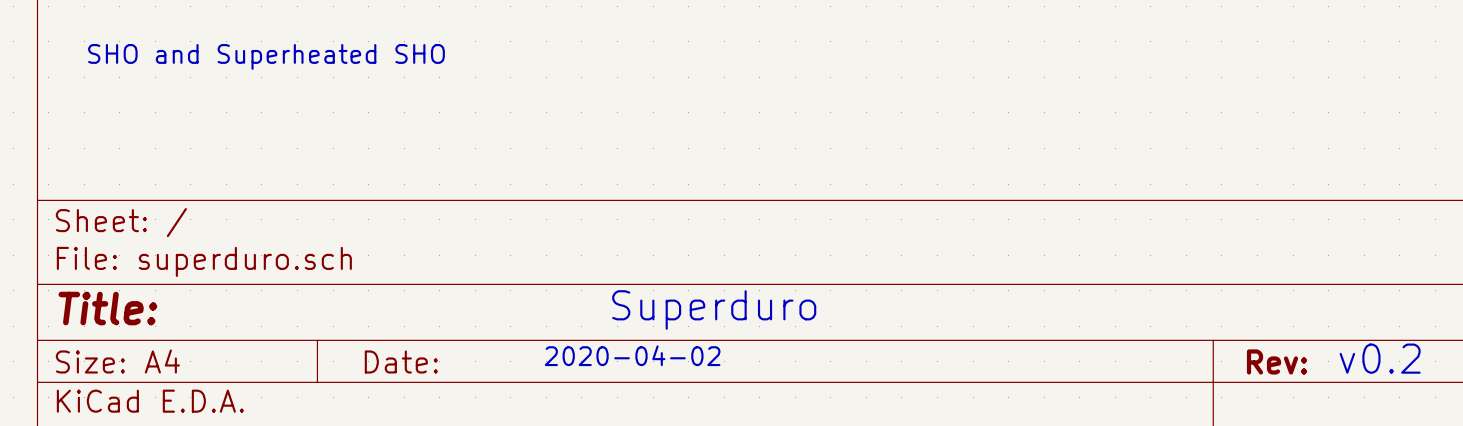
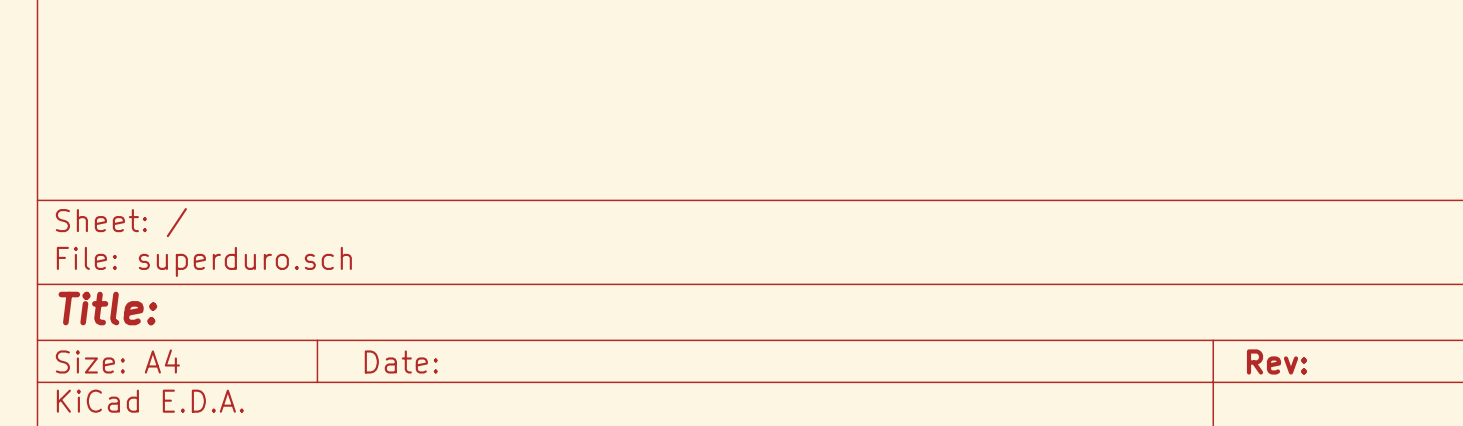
text: SHO and Superheated SHO (266, 56) -> none
text: Superduro (714, 309) -> none
text: 2020-04-02 (632, 355) -> none
text: v0.2 (1380, 358) -> none

